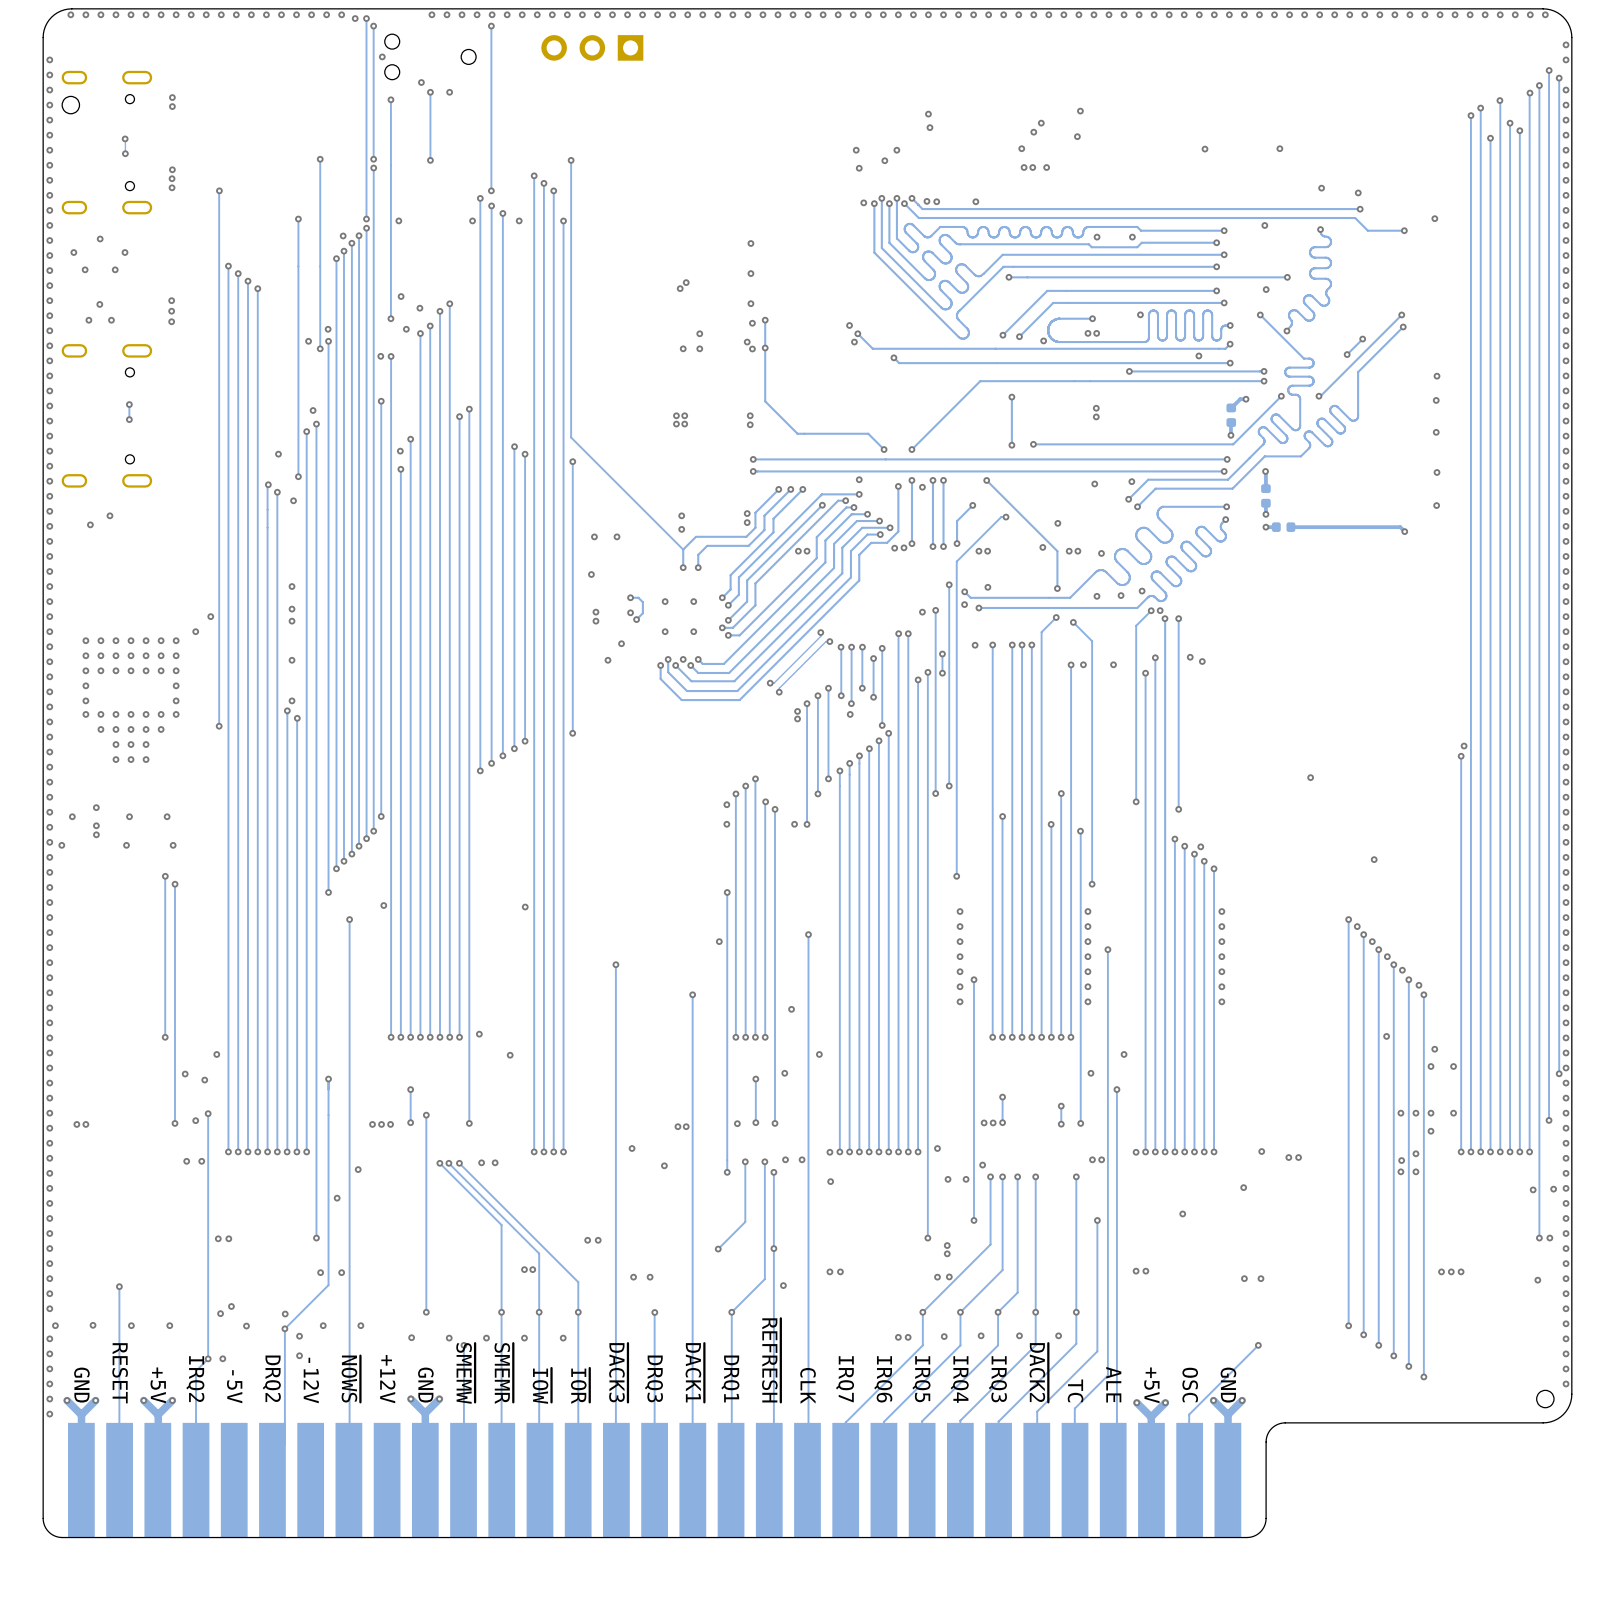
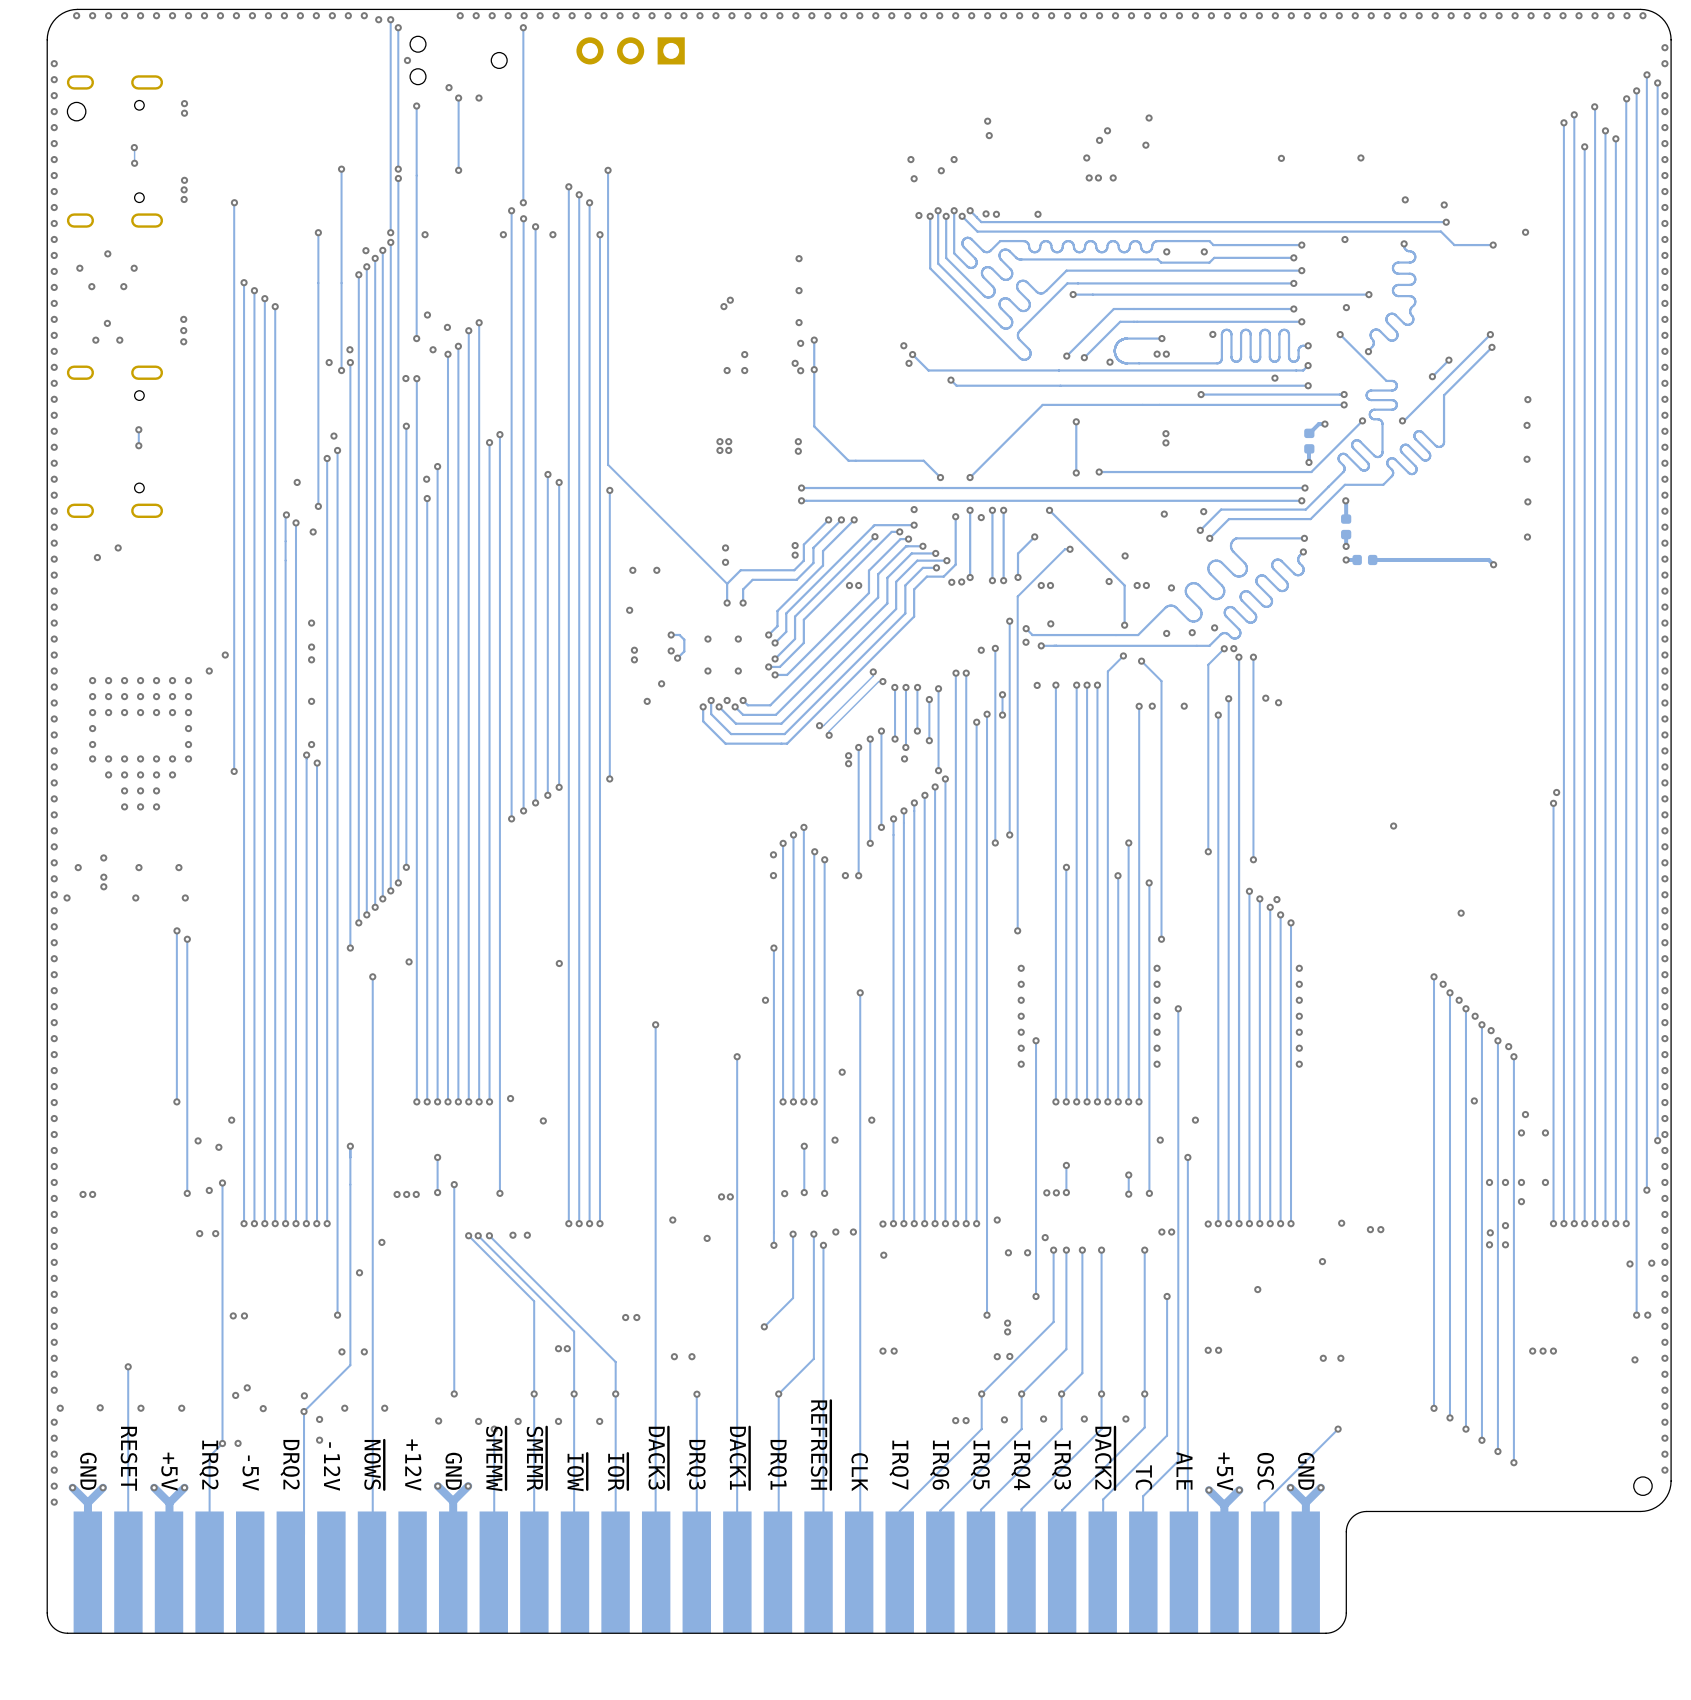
via: (773, 1248) -> none
via: (783, 1285) -> none

